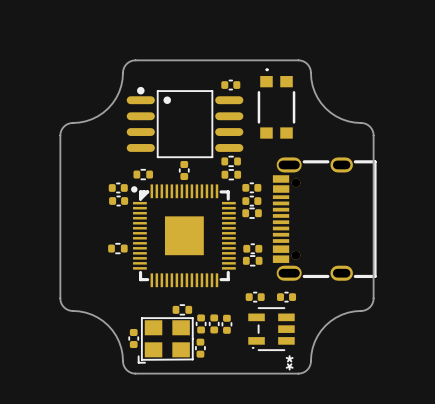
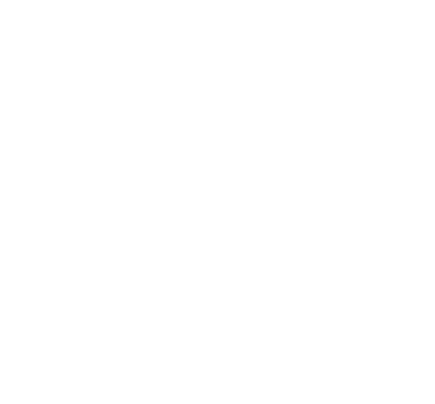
board edge: (135, 60) (302, 61) (309, 67) (314, 92) (325, 108) (341, 119) (365, 123) (372, 130) (373, 301) (366, 309) (341, 314) (325, 325) (314, 341) (310, 365) (303, 372) (132, 373) (124, 366) (119, 341) (108, 325) (92, 314) (68, 310) (61, 303) (61, 131) (67, 124) (92, 119) (108, 108) (119, 92) (124, 66) (128, 62) (135, 60) -> none
part: (230, 85) -> none
part: (276, 103) -> none
part: (185, 122) -> none
part: (231, 161) -> none
part: (184, 170) -> none
part: (143, 174) -> none
part: (231, 174) -> none
part: (118, 187) -> none
part: (251, 187) -> none
part: (118, 201) -> none
part: (251, 201) -> none
part: (252, 213) -> none
part: (324, 219) -> none
part: (183, 235) -> none
part: (117, 248) -> none
part: (252, 248) -> none
part: (252, 260) -> none
part: (255, 297) -> none
part: (286, 297) -> none
part: (182, 309) -> none
part: (201, 323) -> none
part: (214, 323) -> none
part: (226, 324) -> none
part: (271, 329) -> none
part: (133, 338) -> none
part: (165, 340) -> none
part: (200, 348) -> none

